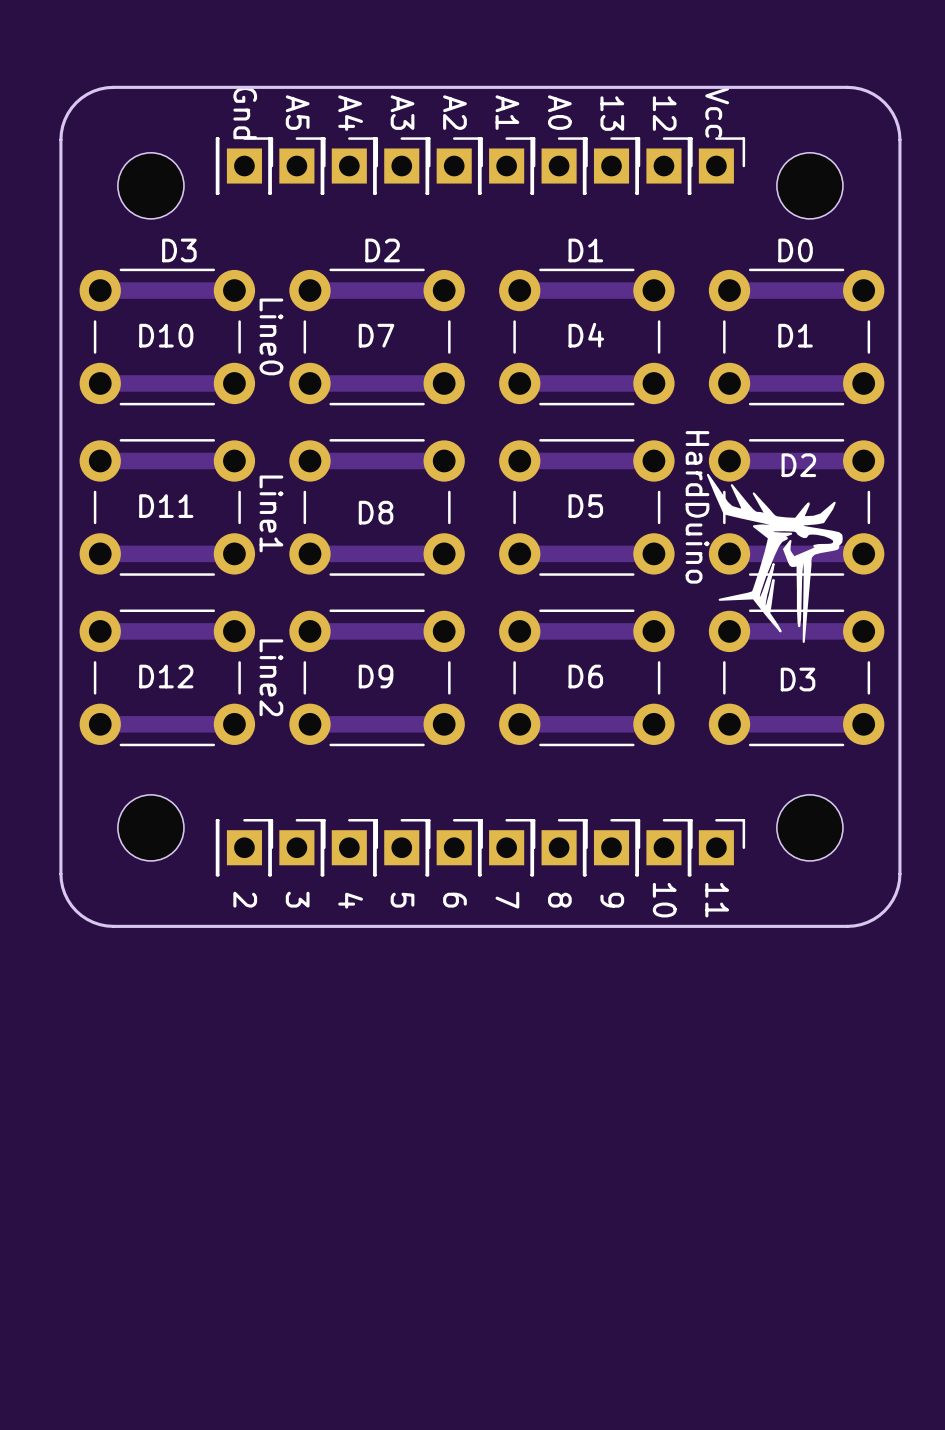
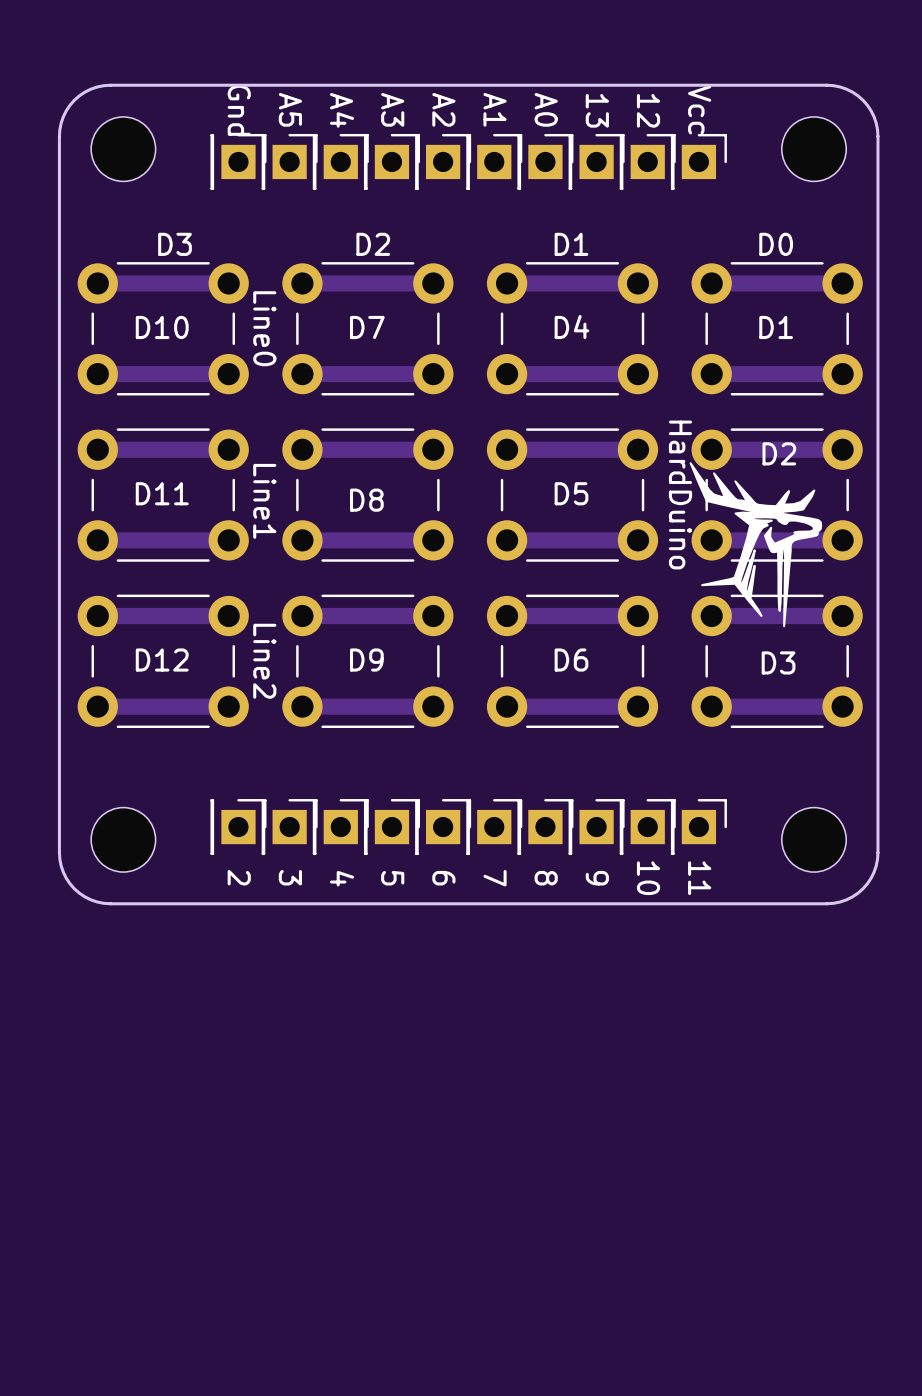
part position: (150, 185) -> (123, 149)
part position: (809, 185) -> (814, 149)
part position: (150, 827) -> (123, 839)
part position: (809, 827) -> (814, 839)

